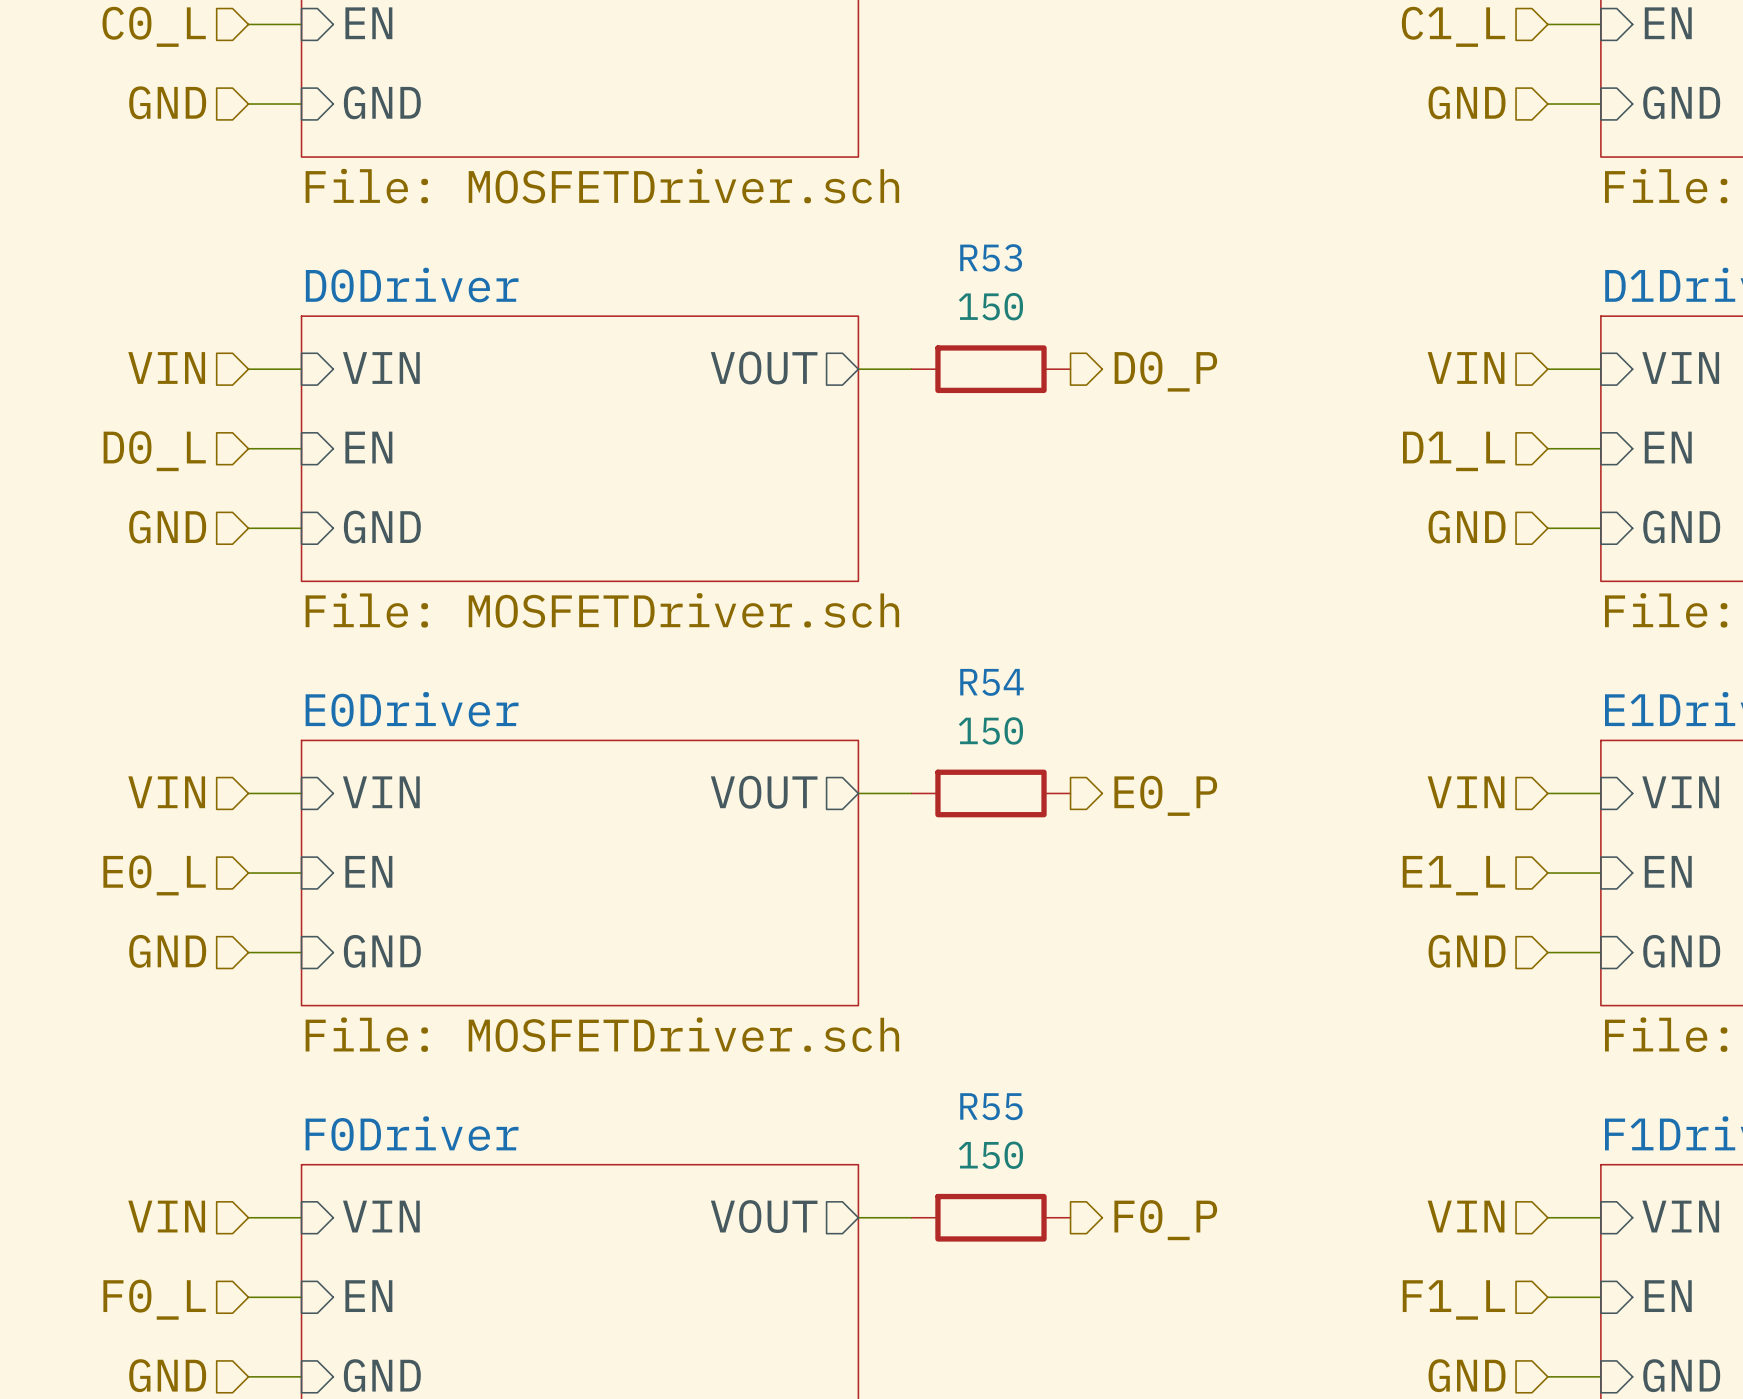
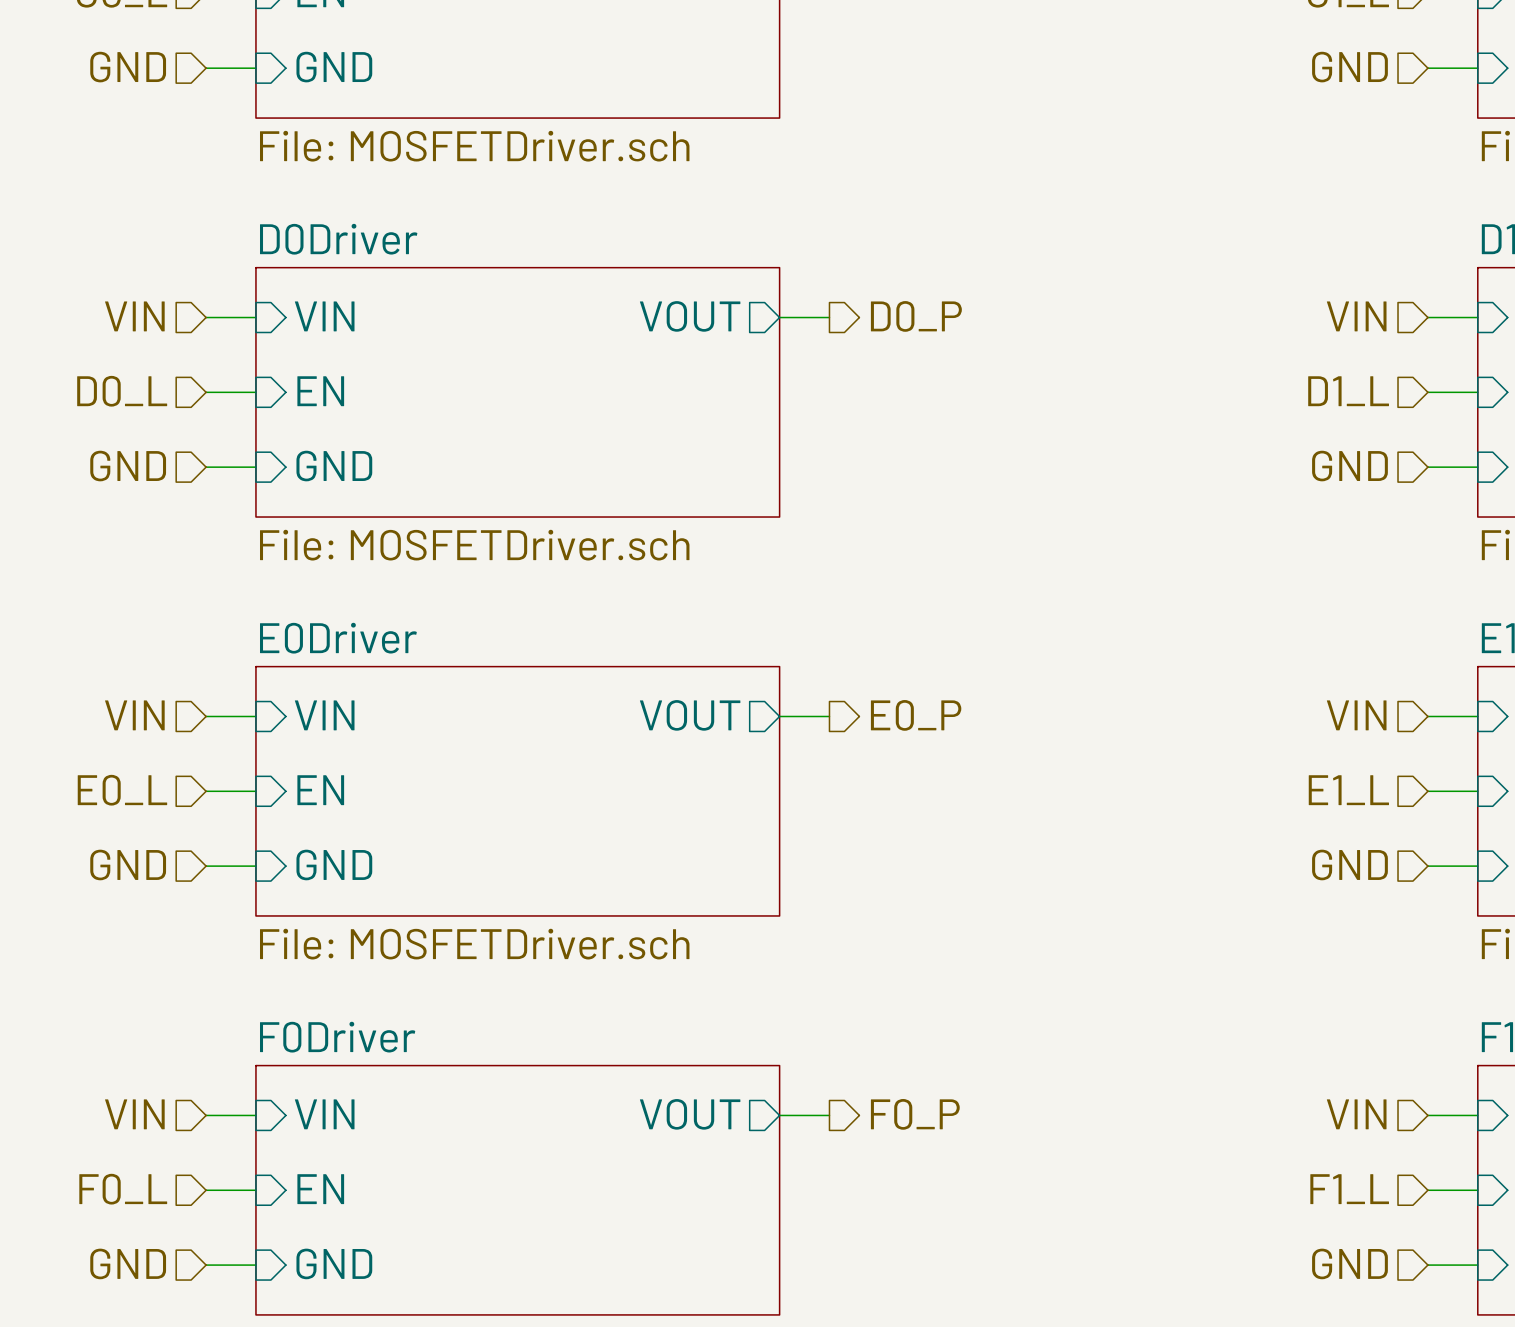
R53: 150 (990, 369) -> none
hierarchical label position: D0_P (1165, 371) -> D0_P (916, 316)
R54: 150 (990, 793) -> none
hierarchical label position: E0_P (1165, 795) -> E0_P (916, 715)
R55: 150 (990, 1217) -> none
hierarchical label position: F0_P (1165, 1220) -> F0_P (915, 1114)

